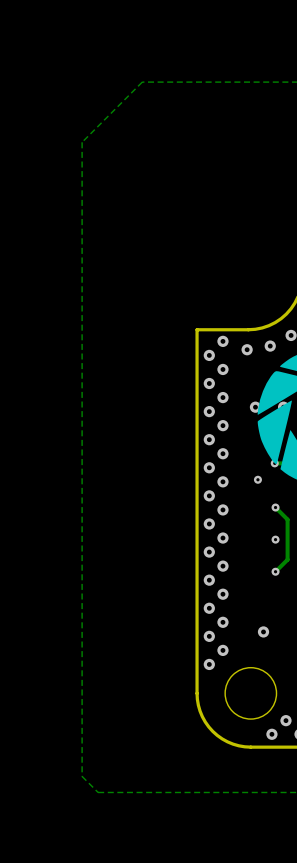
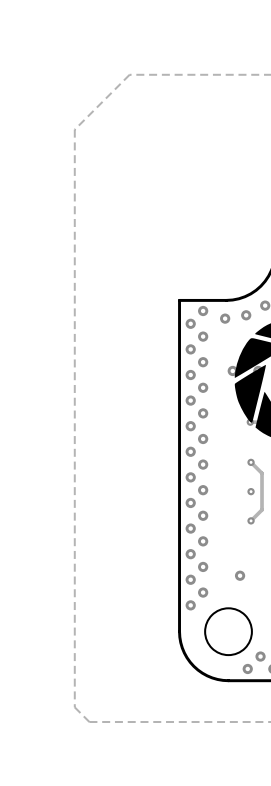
via: (257, 479) -> none

